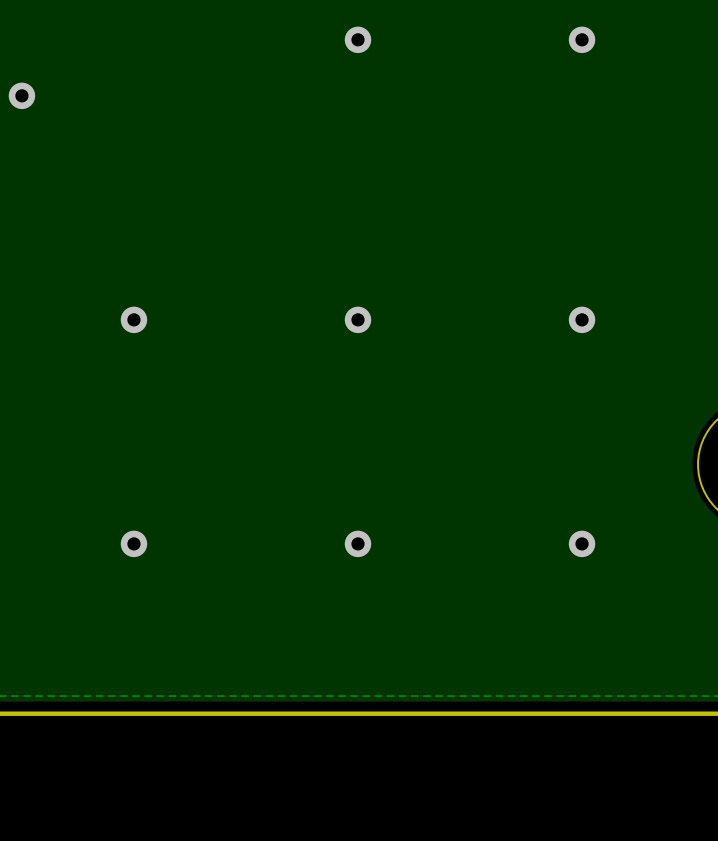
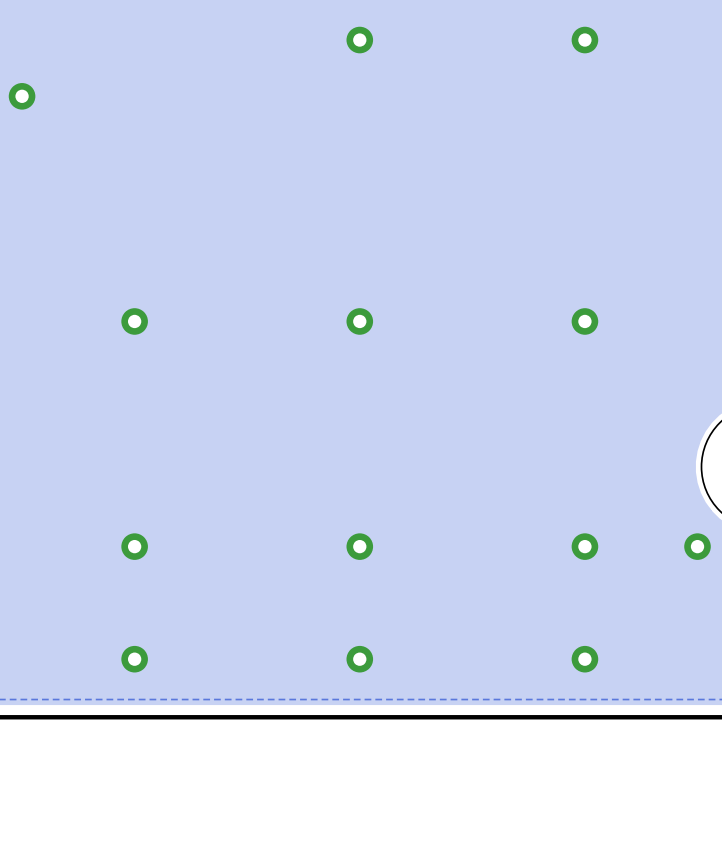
via: none -> (697, 546)
via: none -> (134, 659)
via: none -> (359, 659)
via: none -> (584, 659)

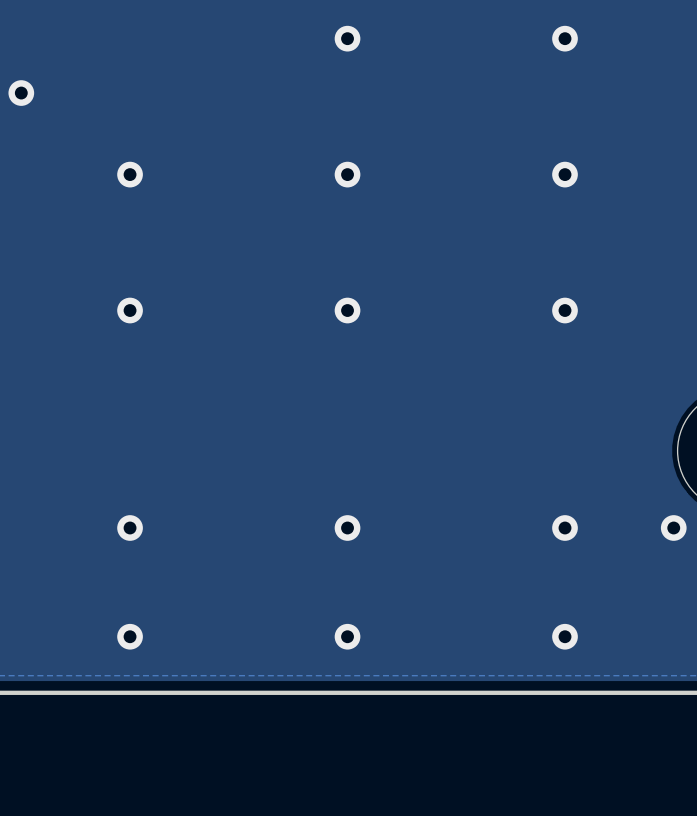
via: none -> (130, 174)
via: none -> (347, 174)
via: none -> (565, 174)

